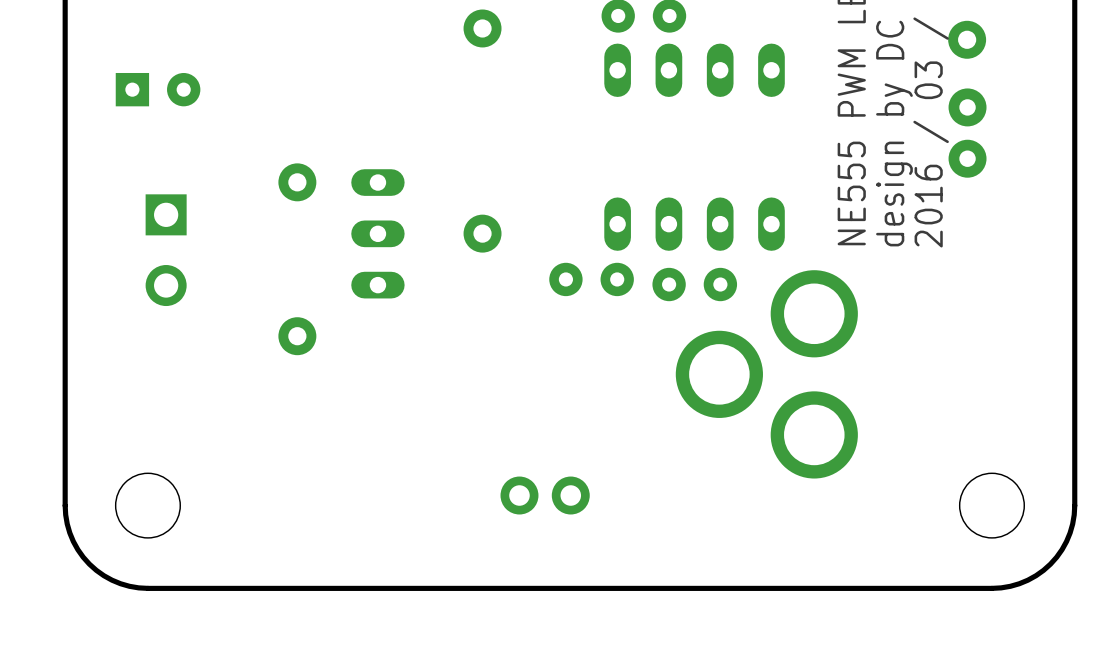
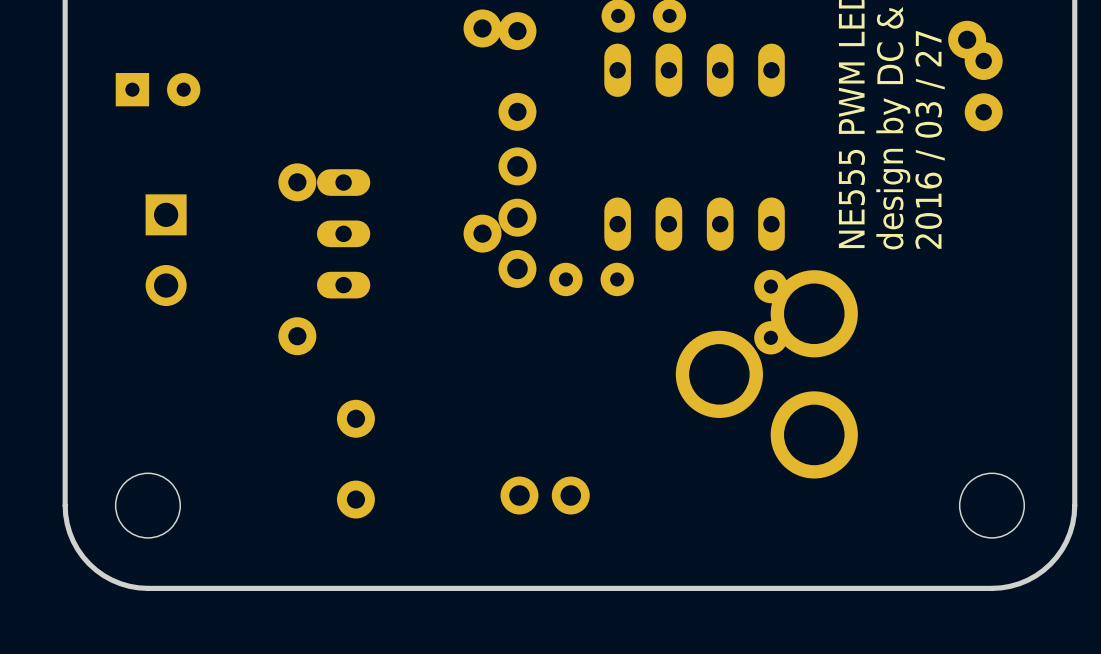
part: none -> (517, 71)
part position: (967, 133) -> (983, 86)
part: none -> (517, 217)
part position: (377, 233) -> (343, 233)
part rotation: 0° (694, 284) -> 90° clockwise (770, 312)
part position: (694, 284) -> (770, 312)
part: none -> (355, 459)

